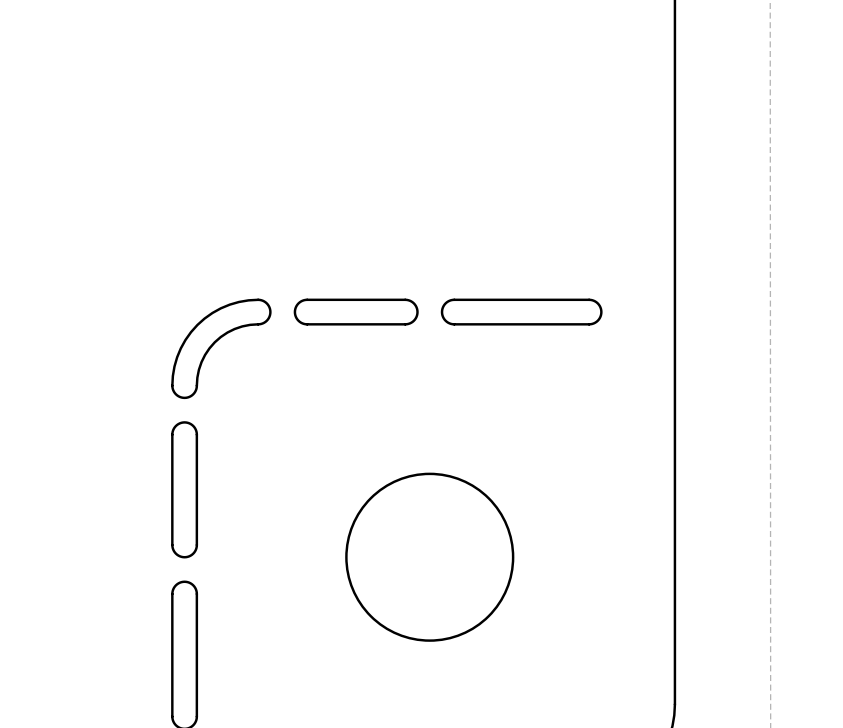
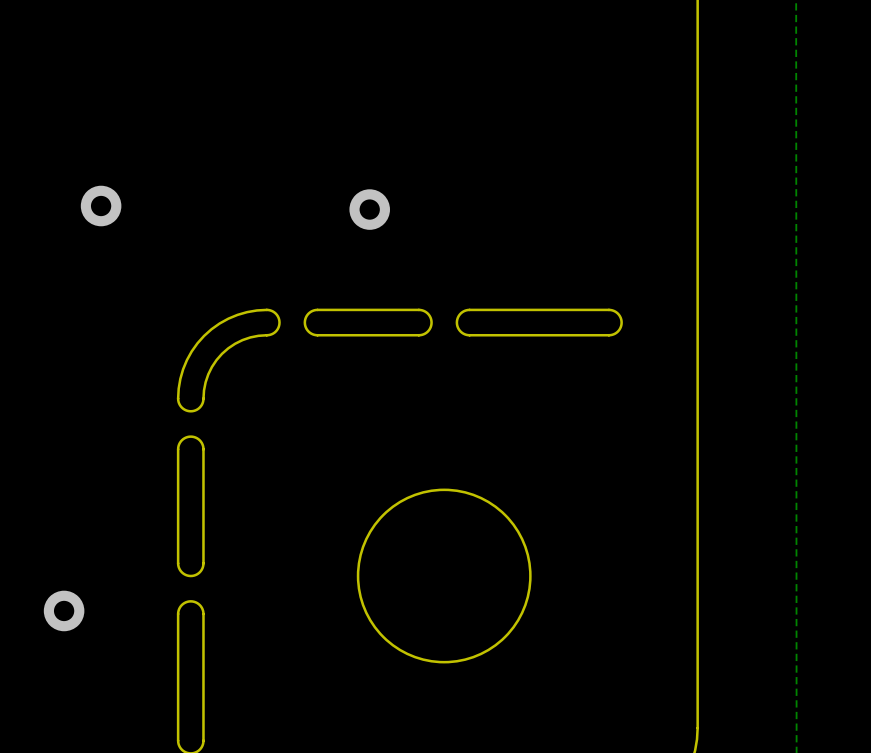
via: none -> (101, 206)
via: none -> (369, 209)
via: none -> (64, 610)

